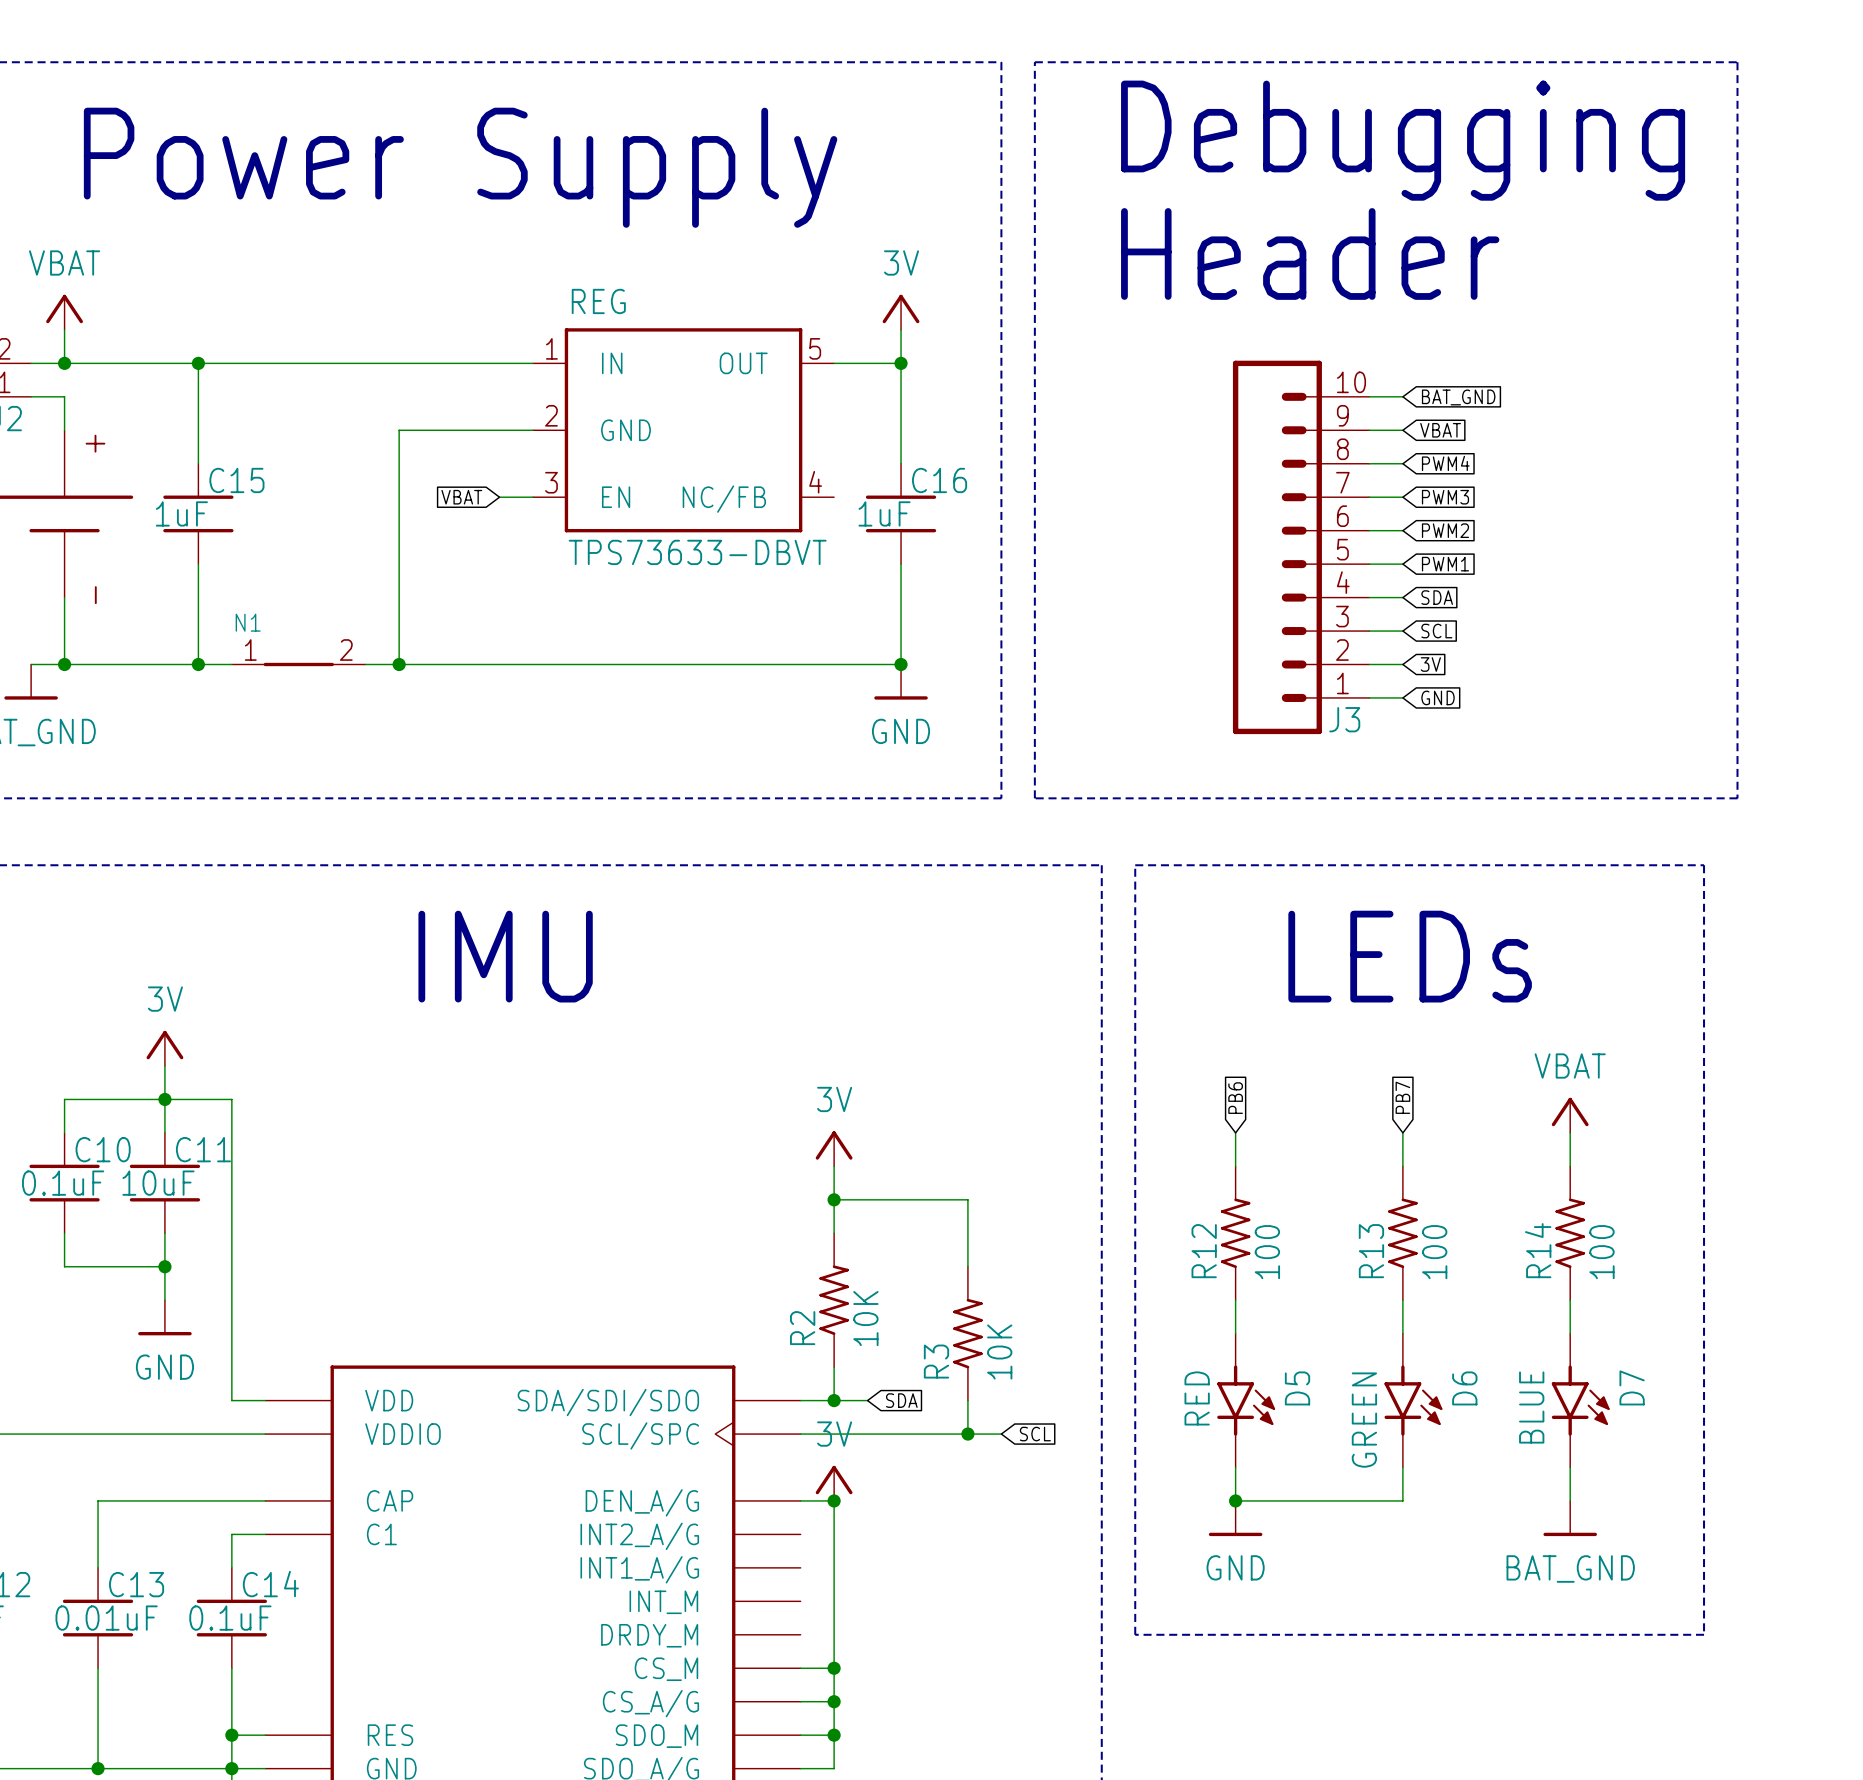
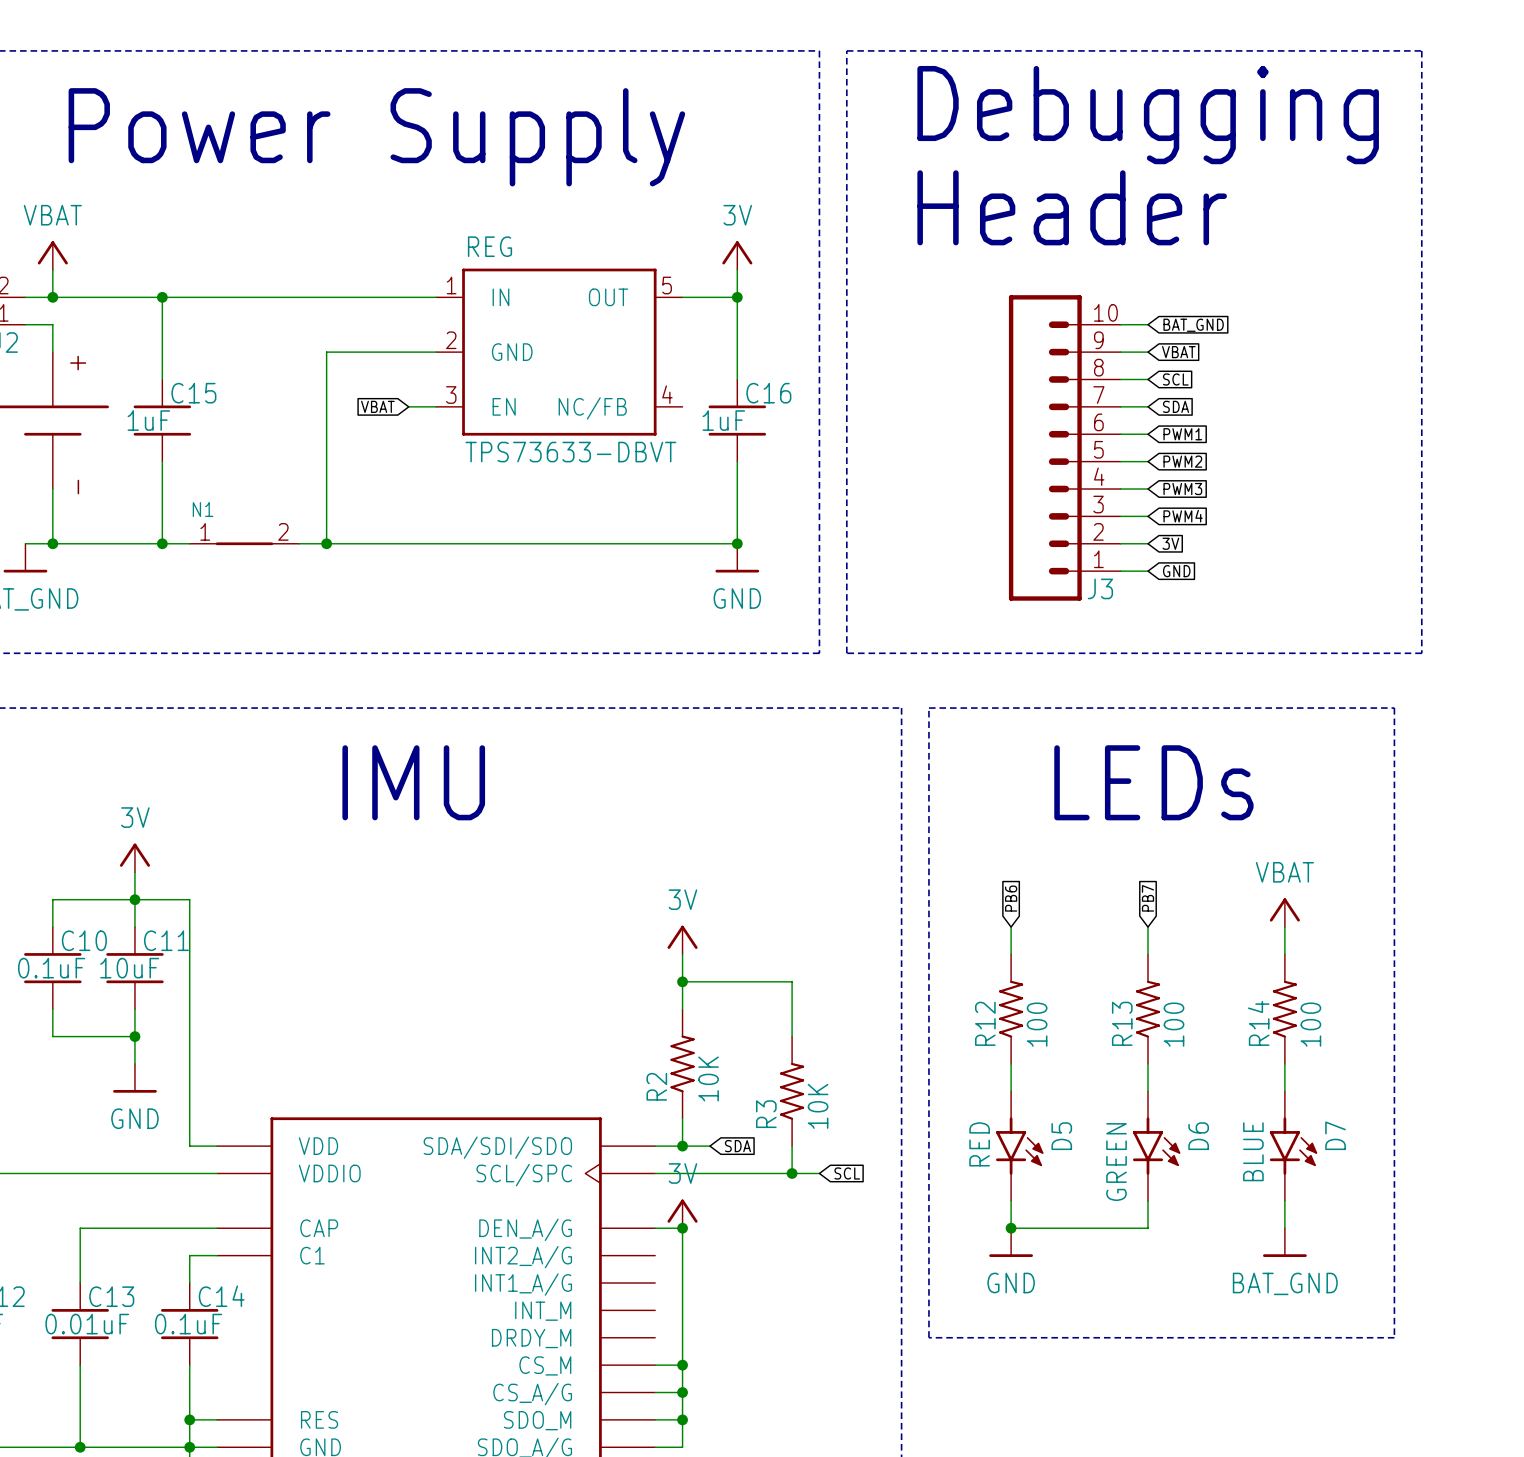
global label: PWM4 (1445, 463) -> SCL (1175, 379)
global label: PWM3 (1445, 497) -> SDA (1176, 406)
global label: PWM2 (1445, 530) -> PWM1 (1182, 434)
global label: PWM1 (1445, 564) -> PWM2 (1182, 461)
global label: SDA (1437, 597) -> PWM3 (1182, 489)
global label: SCL (1436, 631) -> PWM4 (1183, 516)

